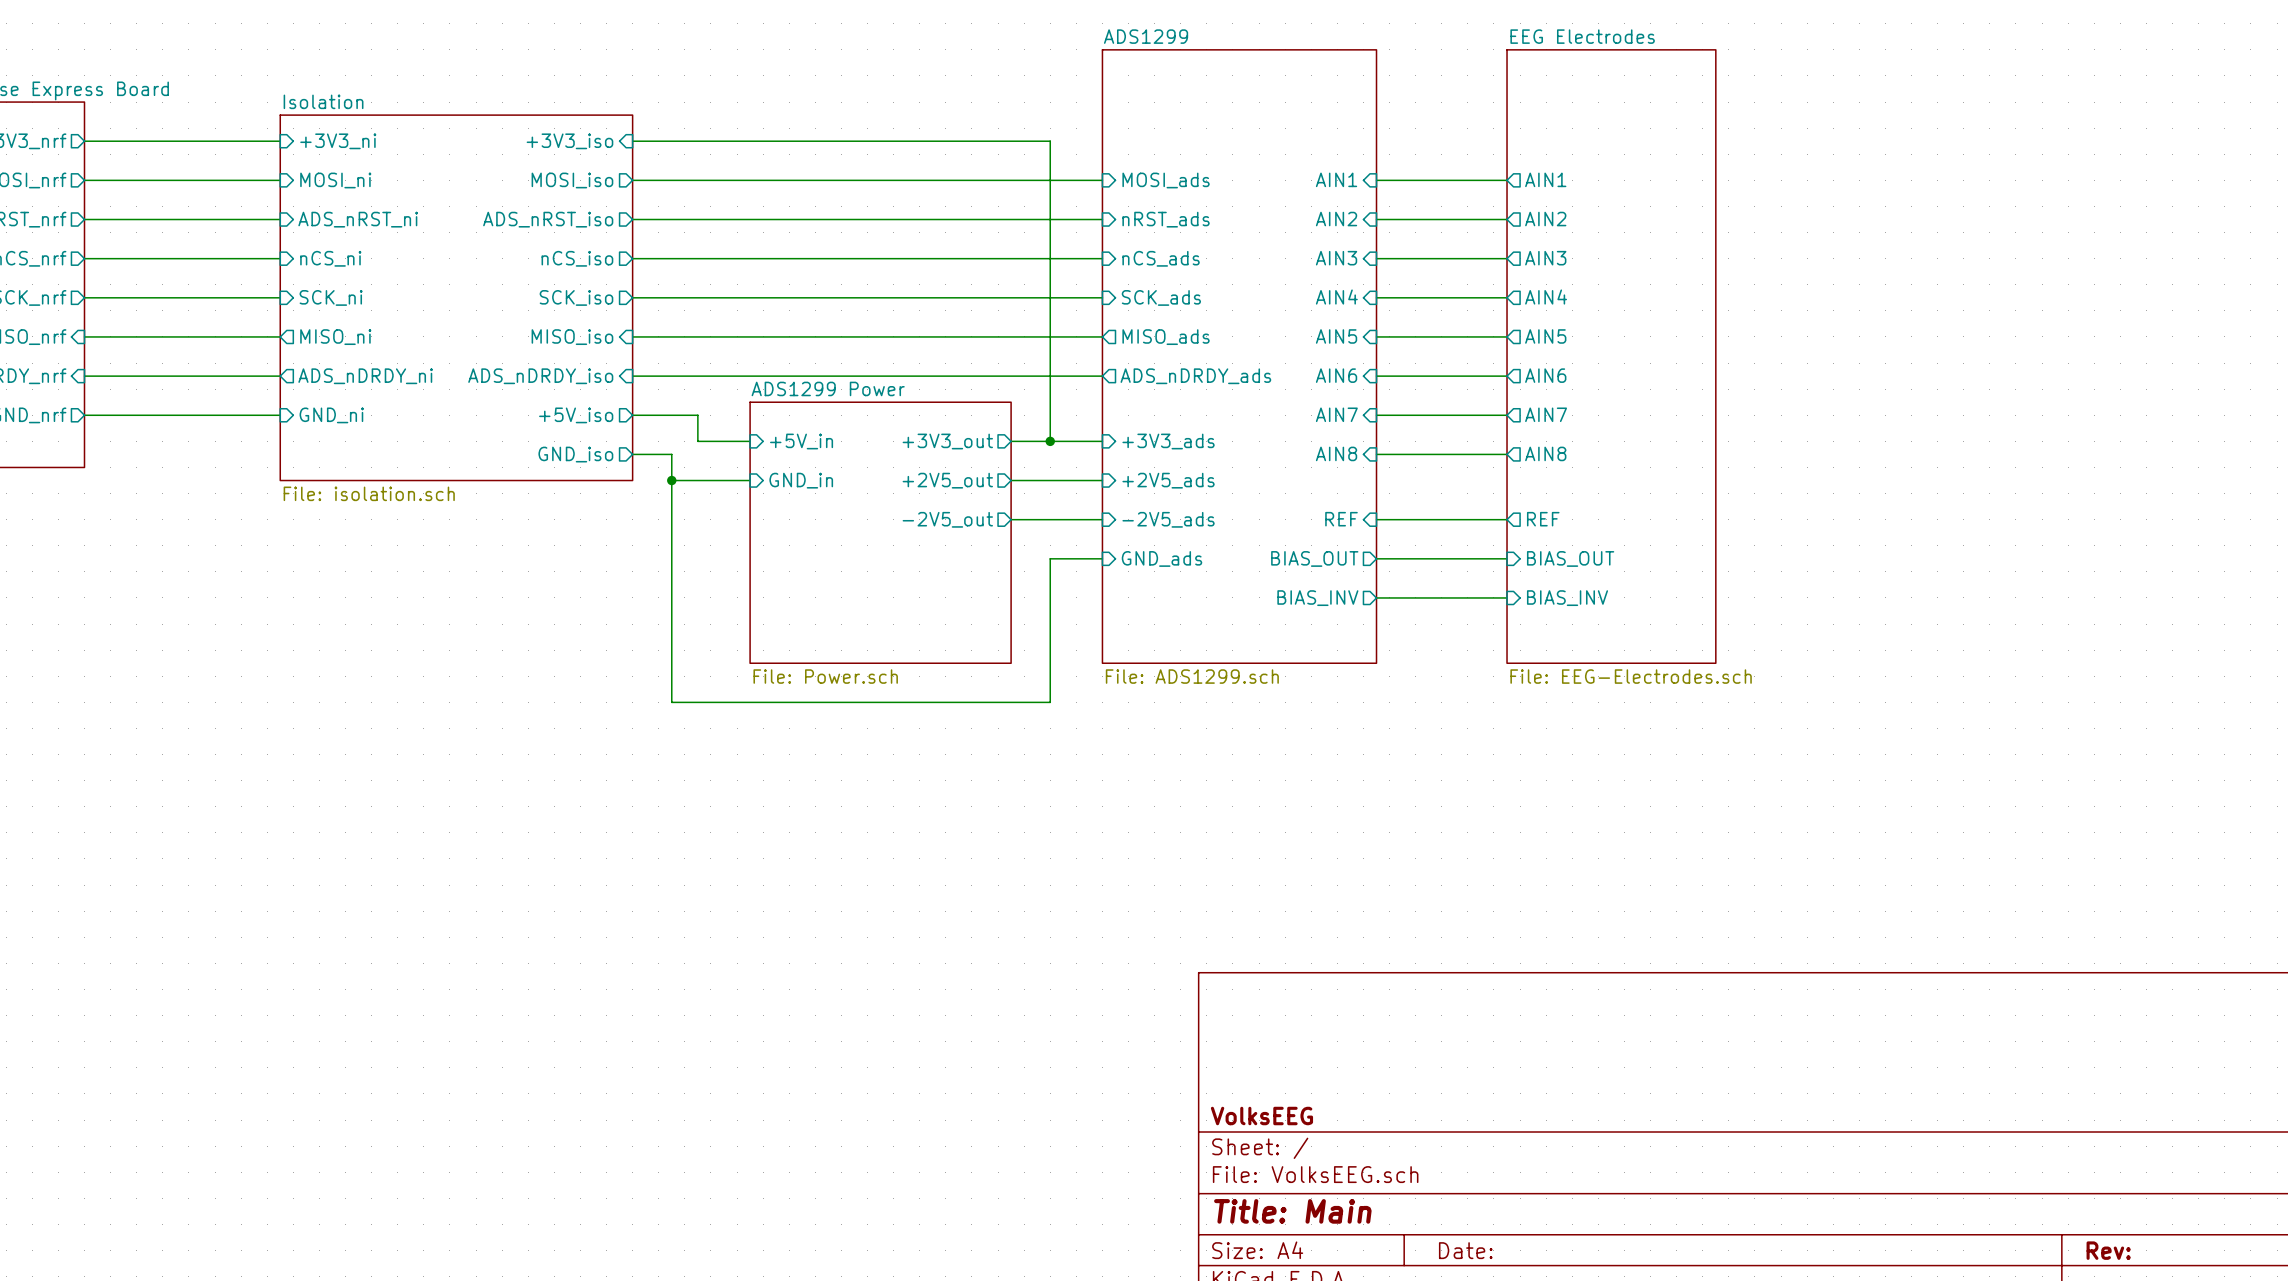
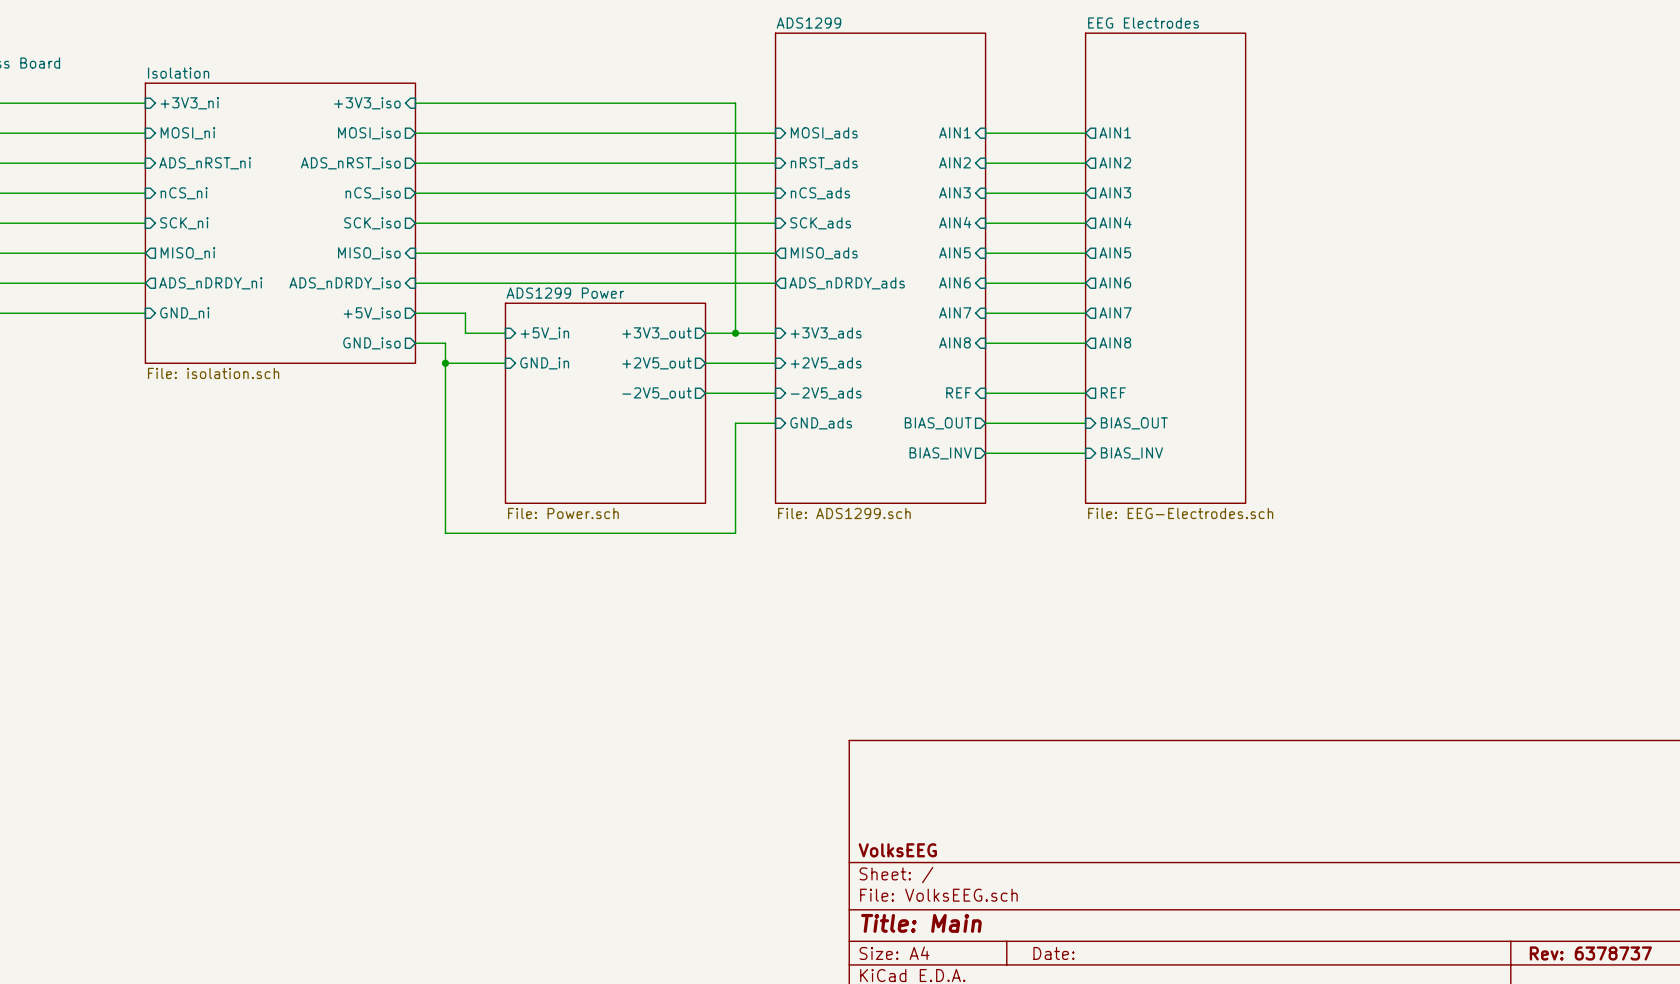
title block: Rev: (2108, 1250) -> Rev: 6378737 (1590, 953)

